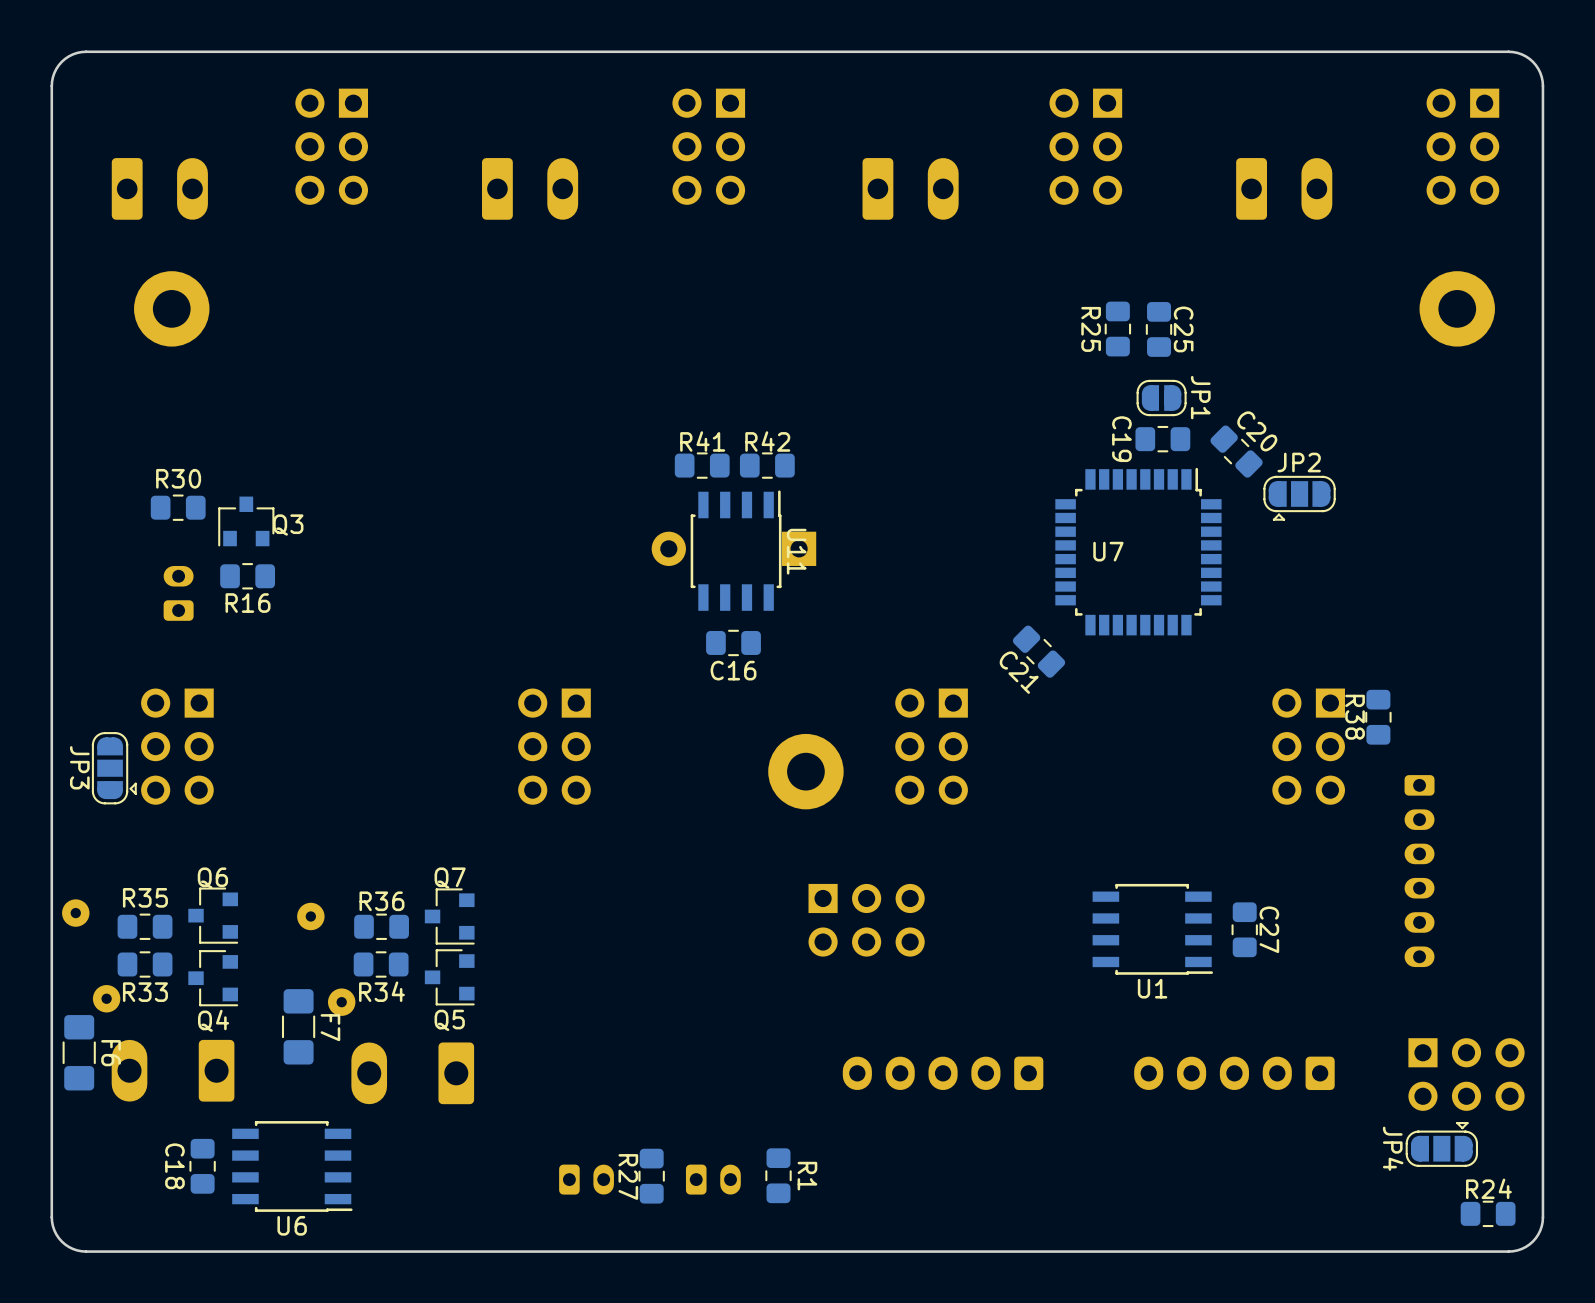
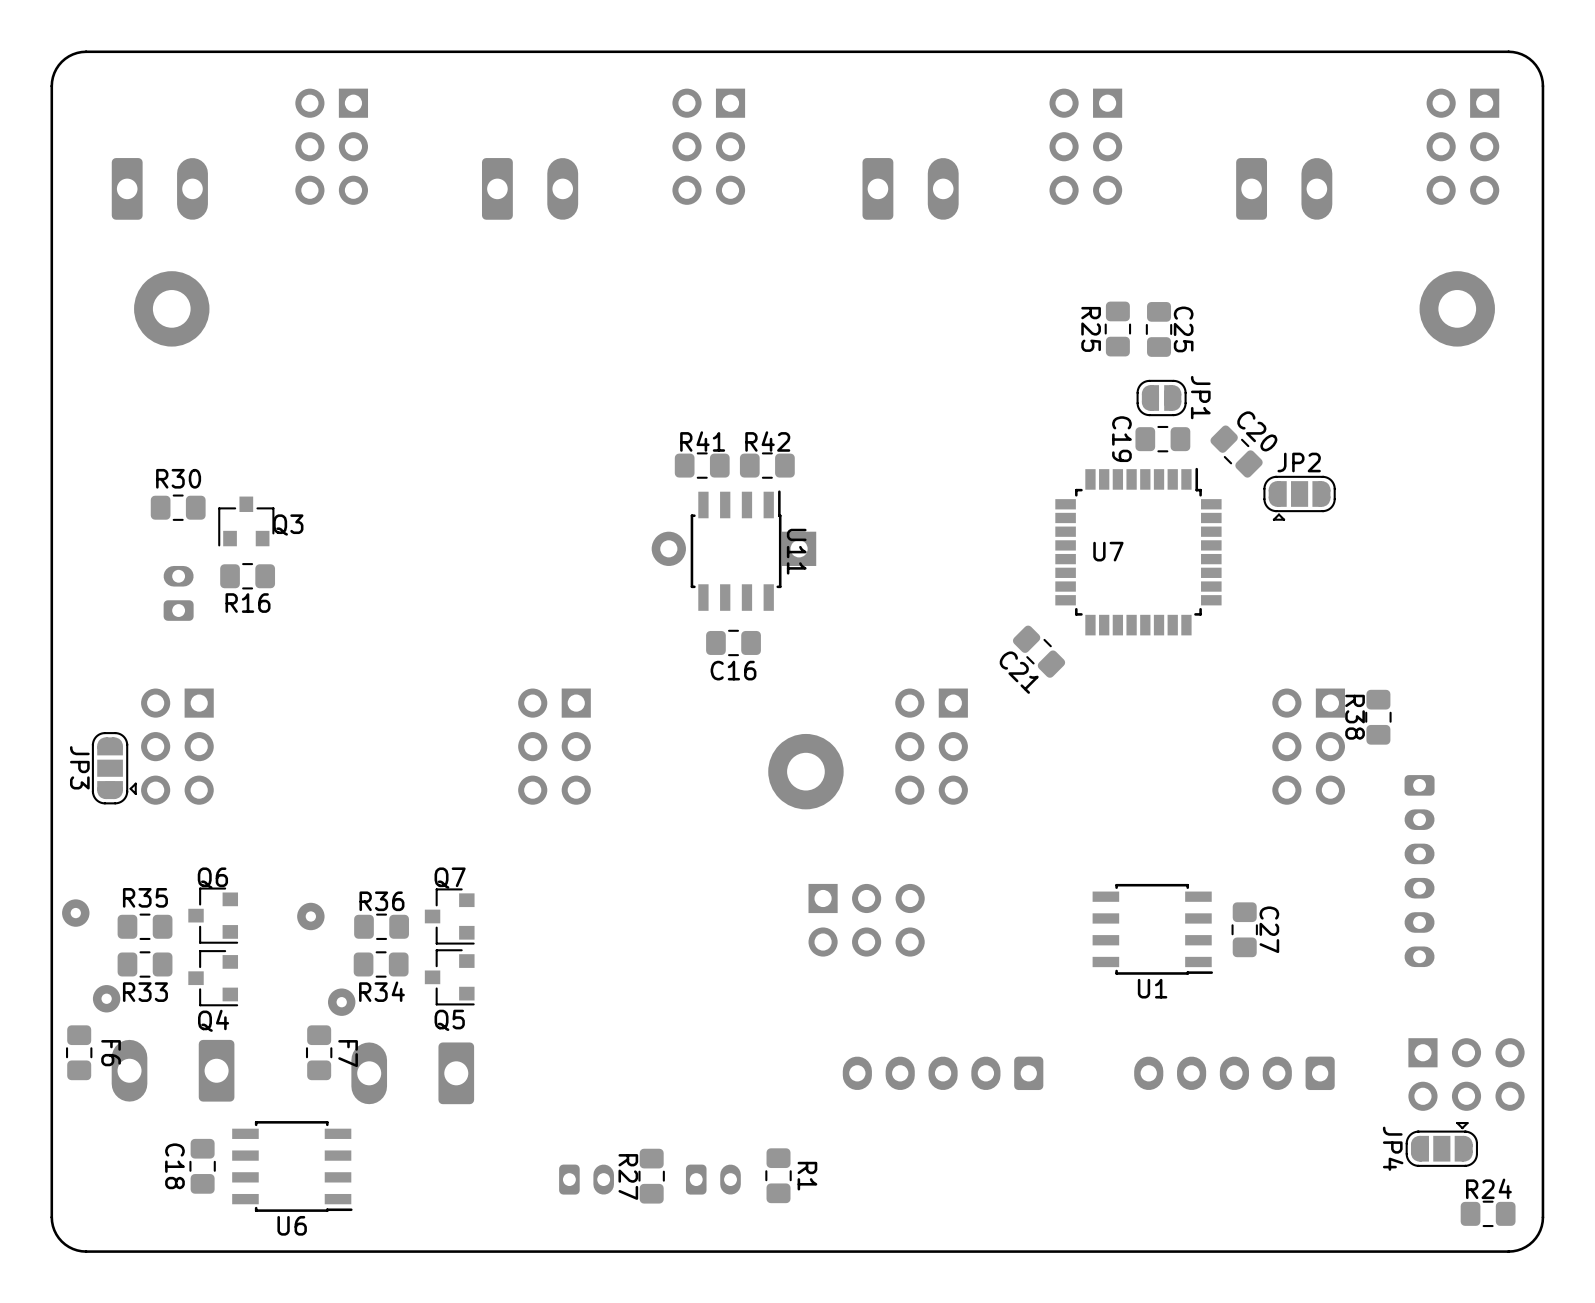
F7 footprint: [281, 989, 316, 1065] -> [305, 1025, 333, 1081]
F6 footprint: [62, 1015, 96, 1091] -> [66, 1025, 93, 1081]

